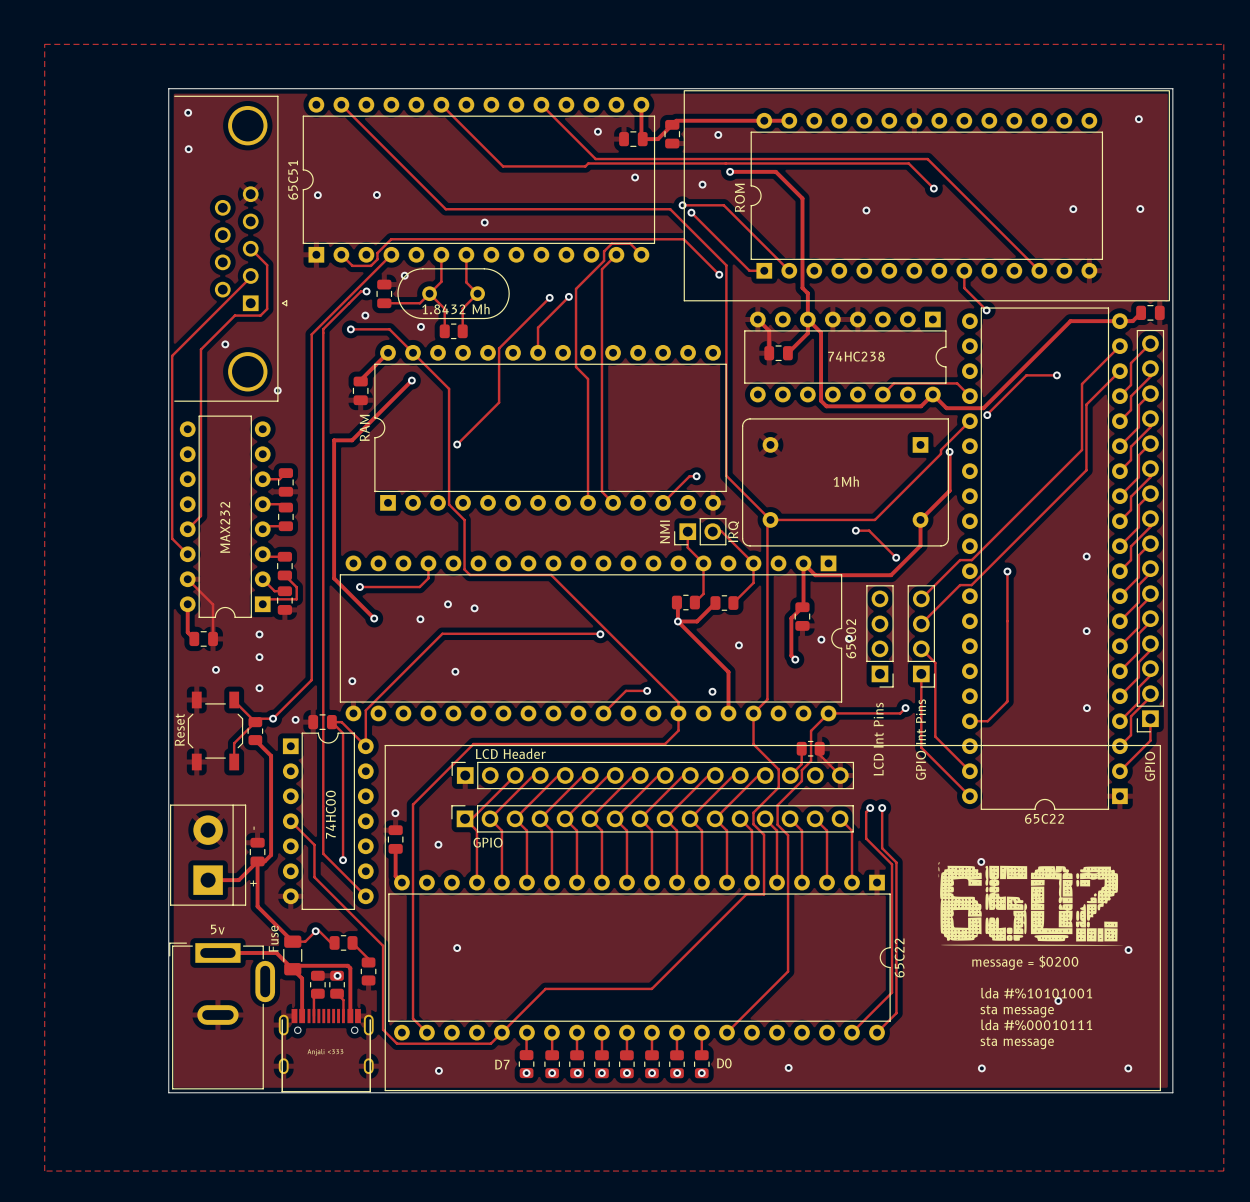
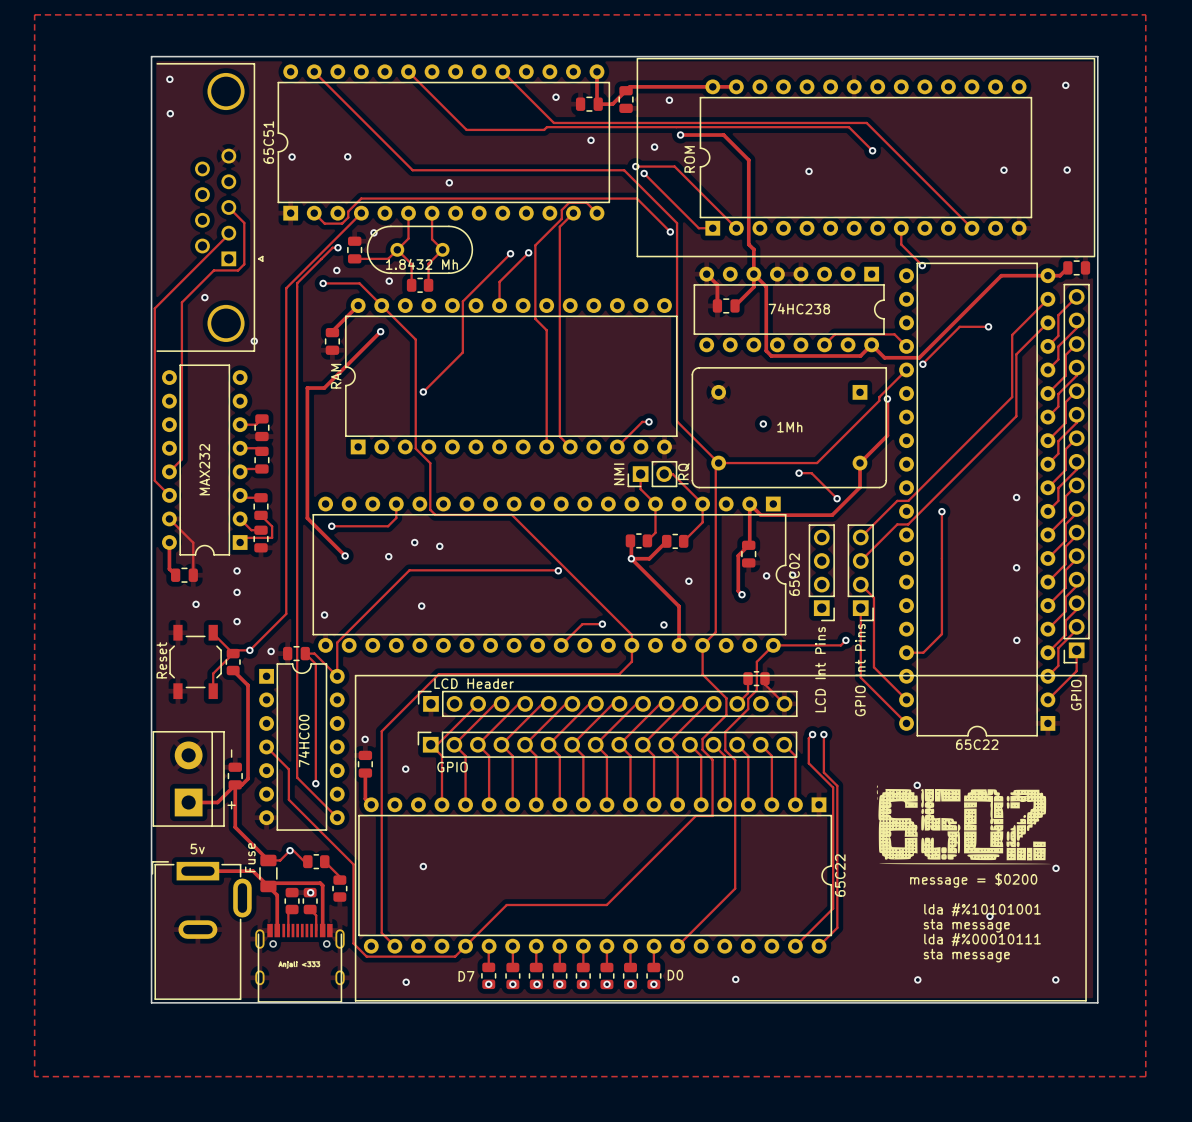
via: none -> (763, 423)

